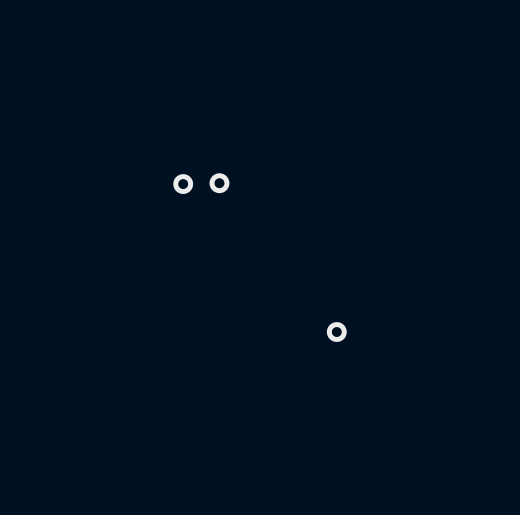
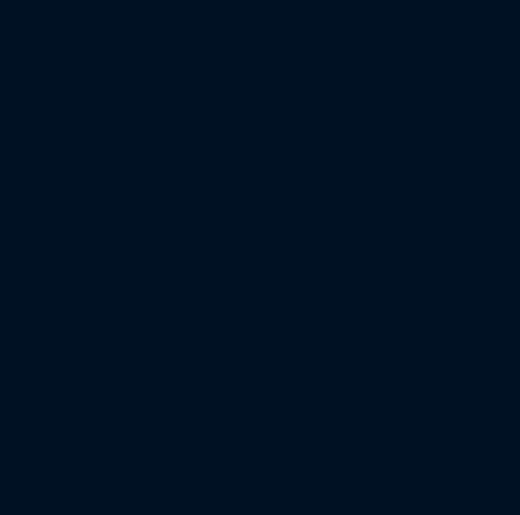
via: (219, 183) -> none
via: (183, 184) -> none
via: (336, 332) -> none

